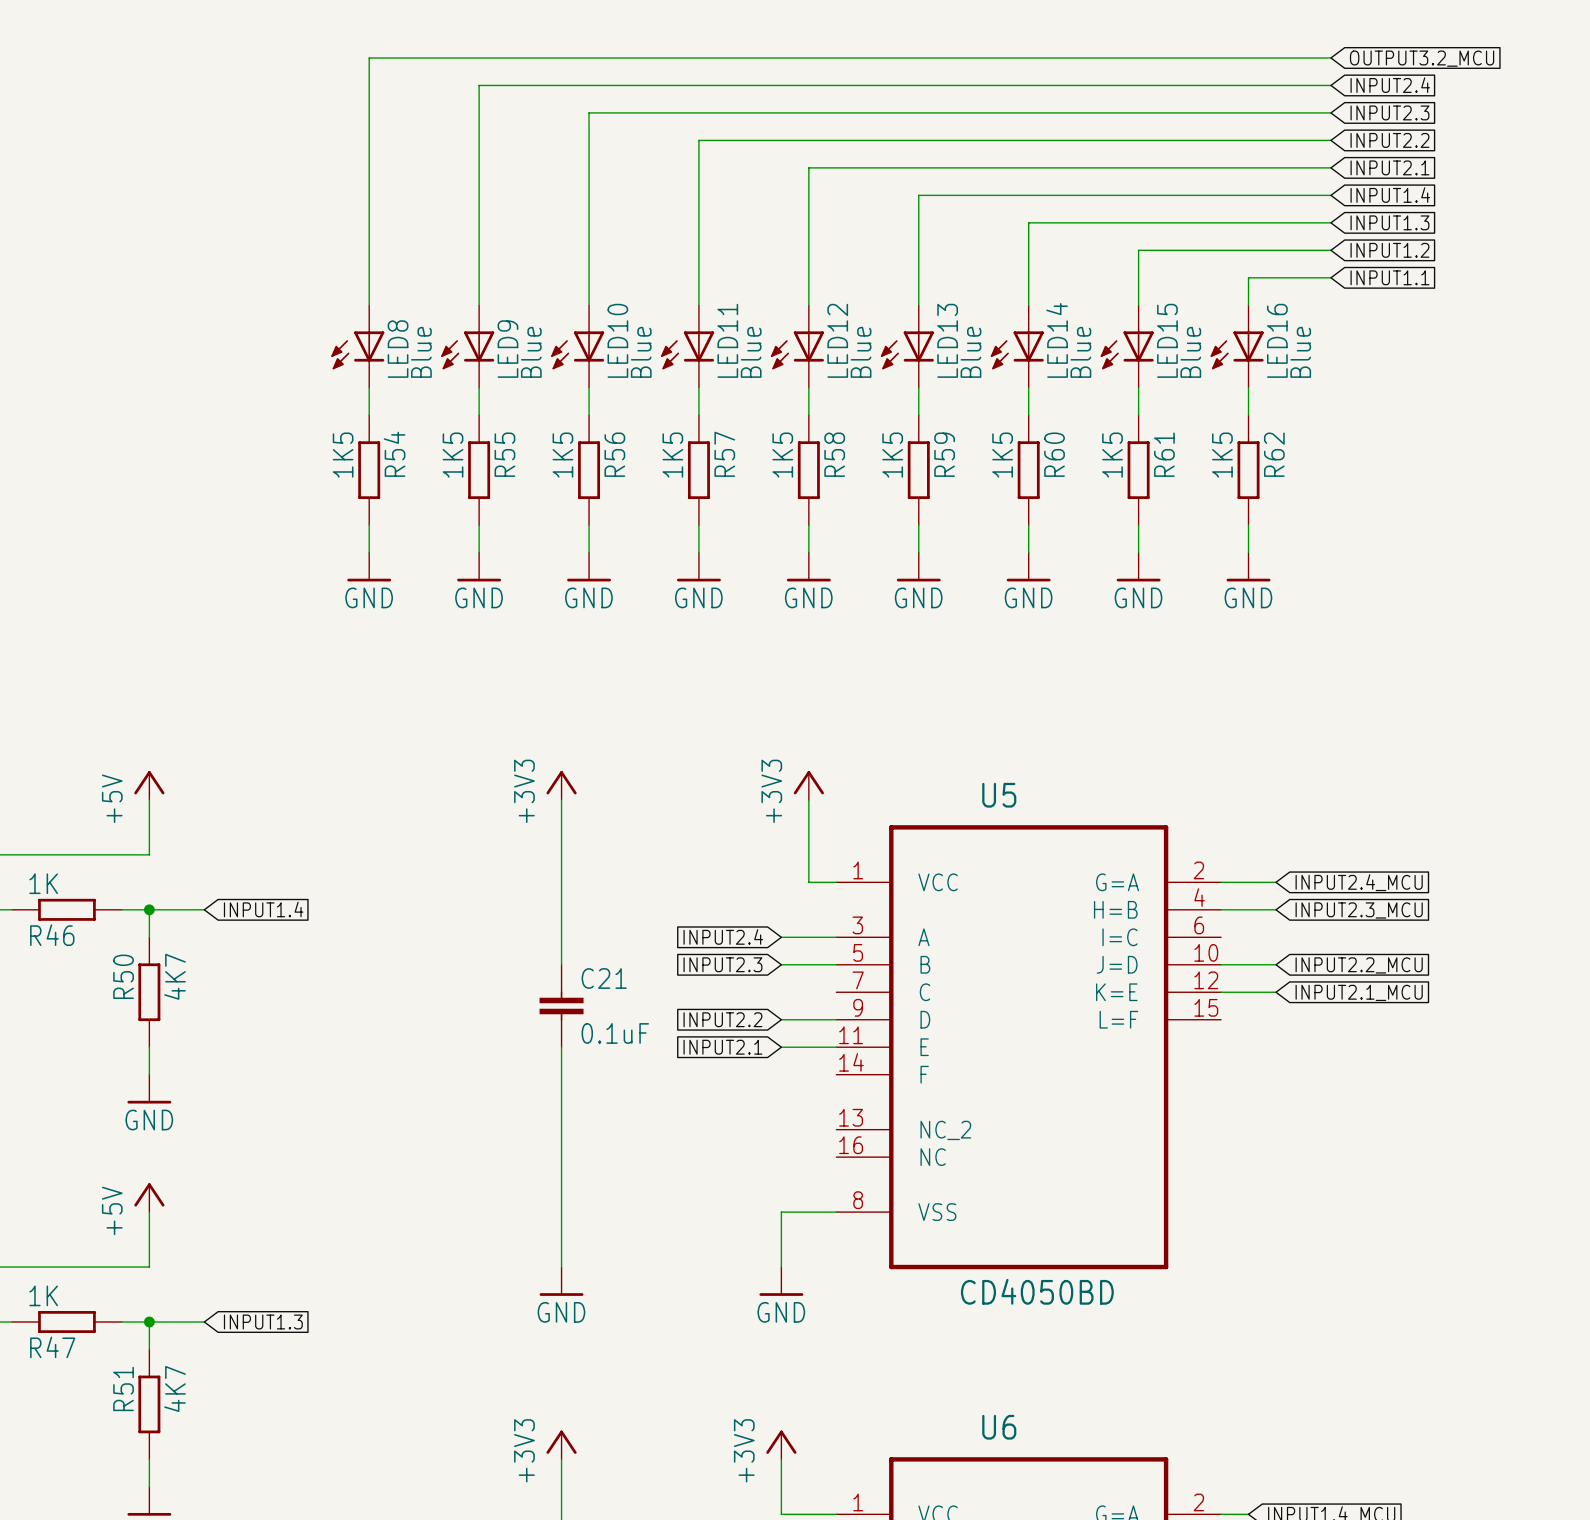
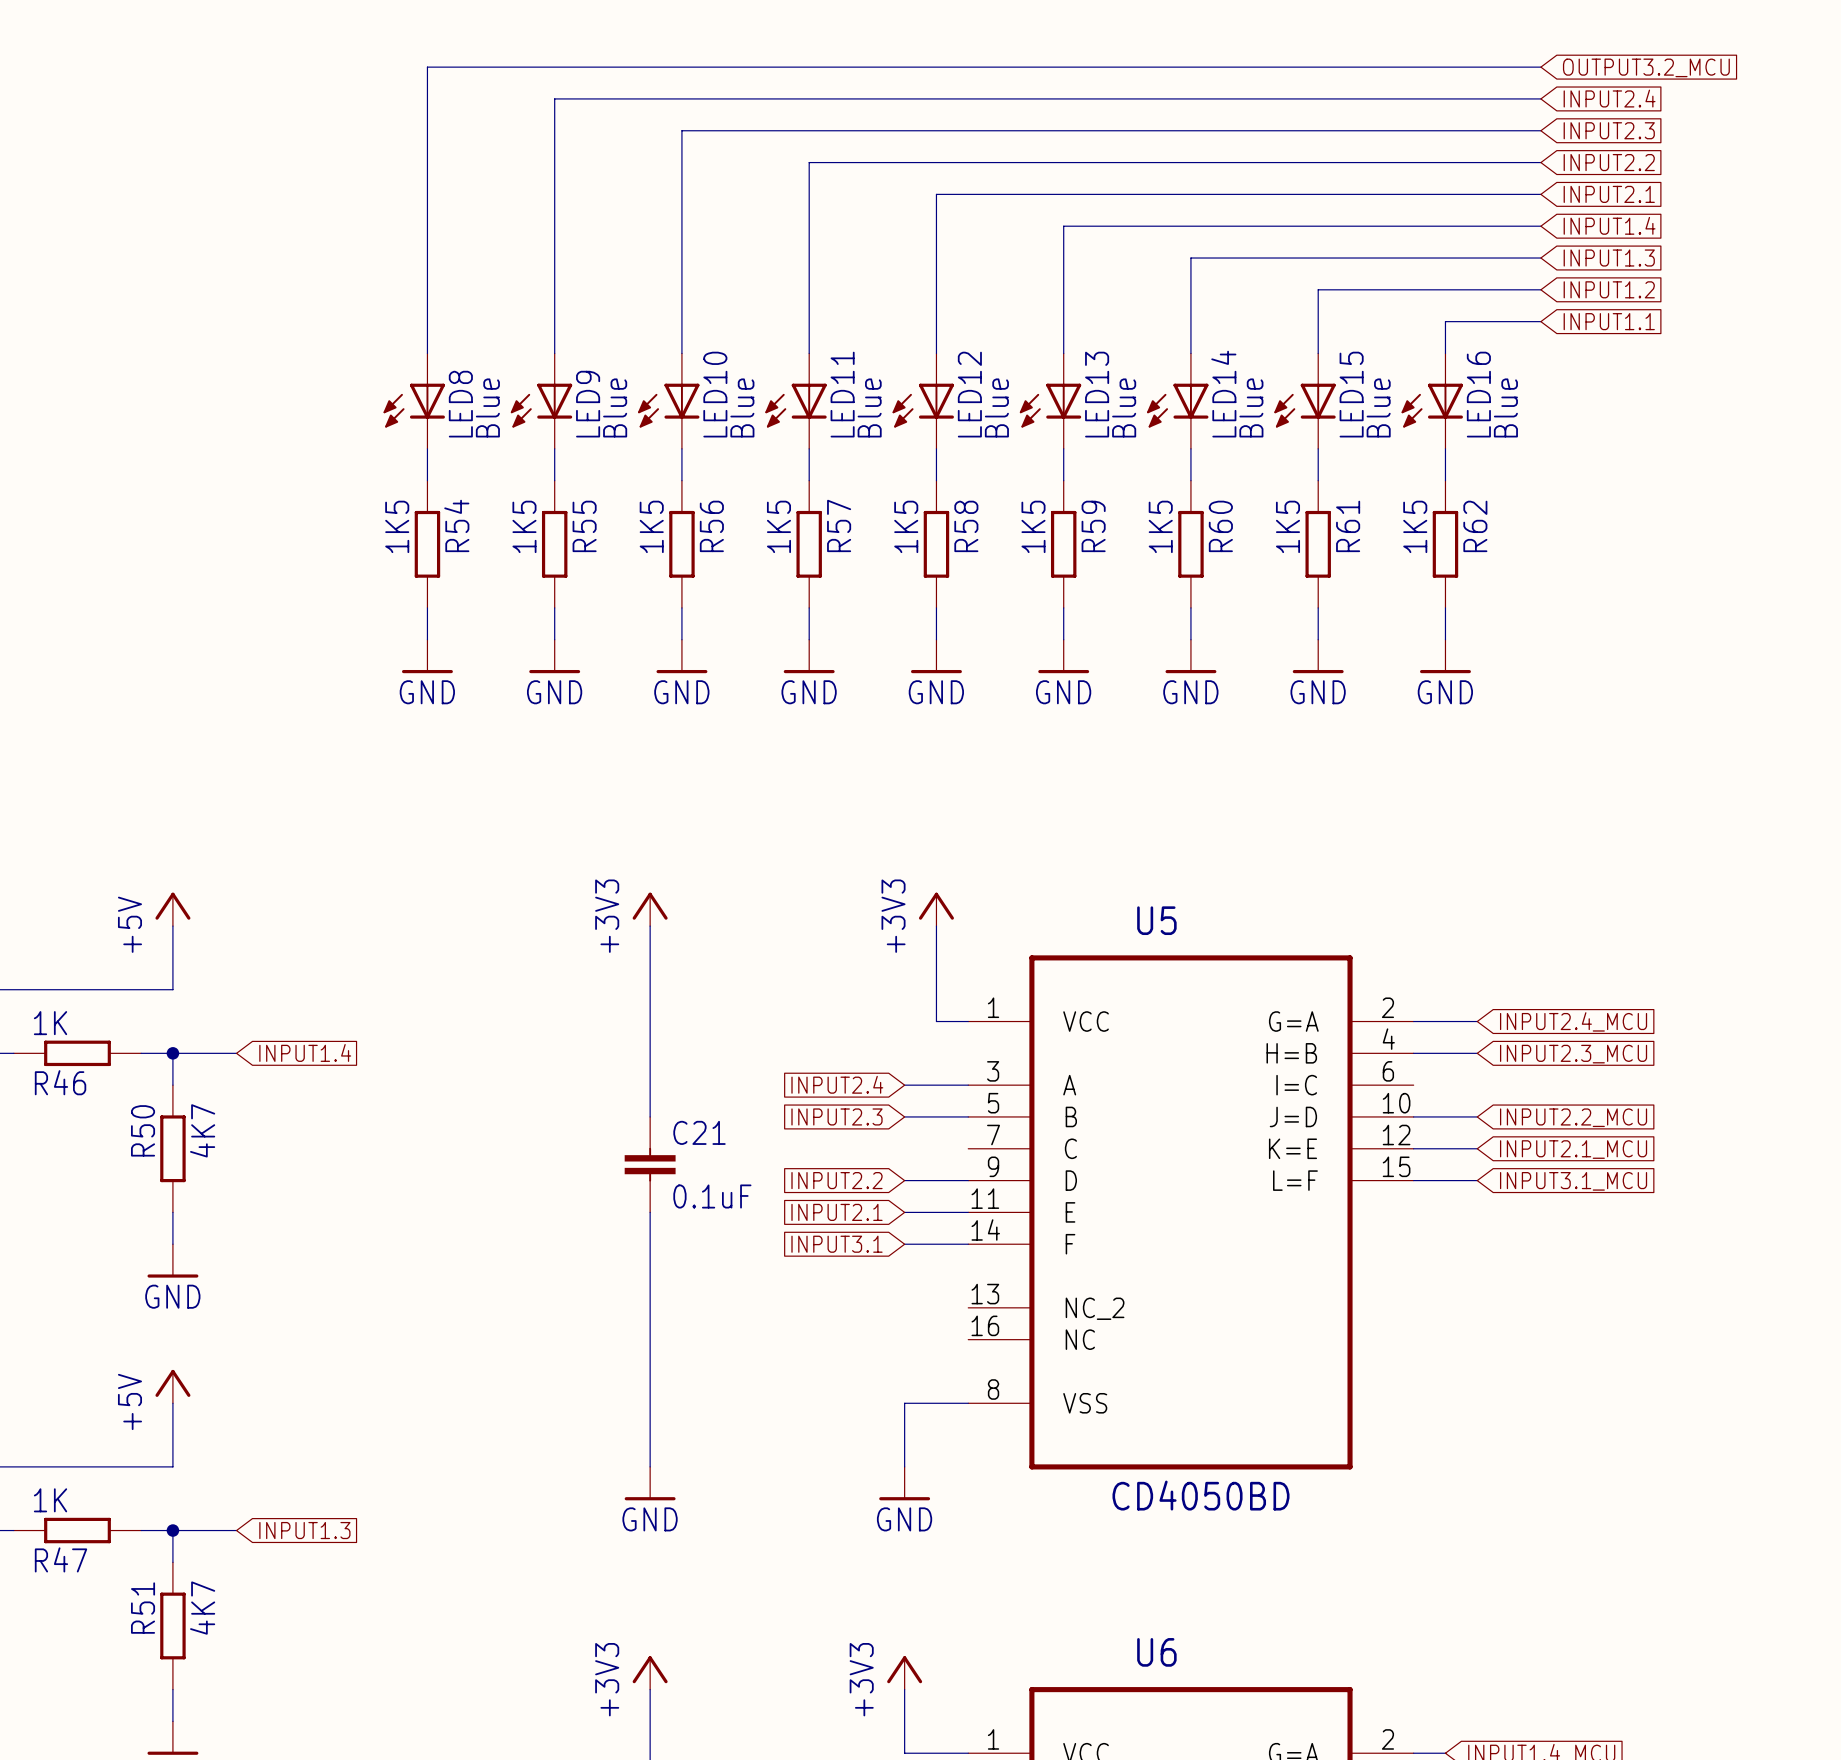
wire: none -> (1413, 1180) (1477, 1180)
global label: none -> INPUT3.1_MCU (1573, 1181)
global label: none -> INPUT3.1 (836, 1244)
wire: none -> (904, 1244) (968, 1244)

